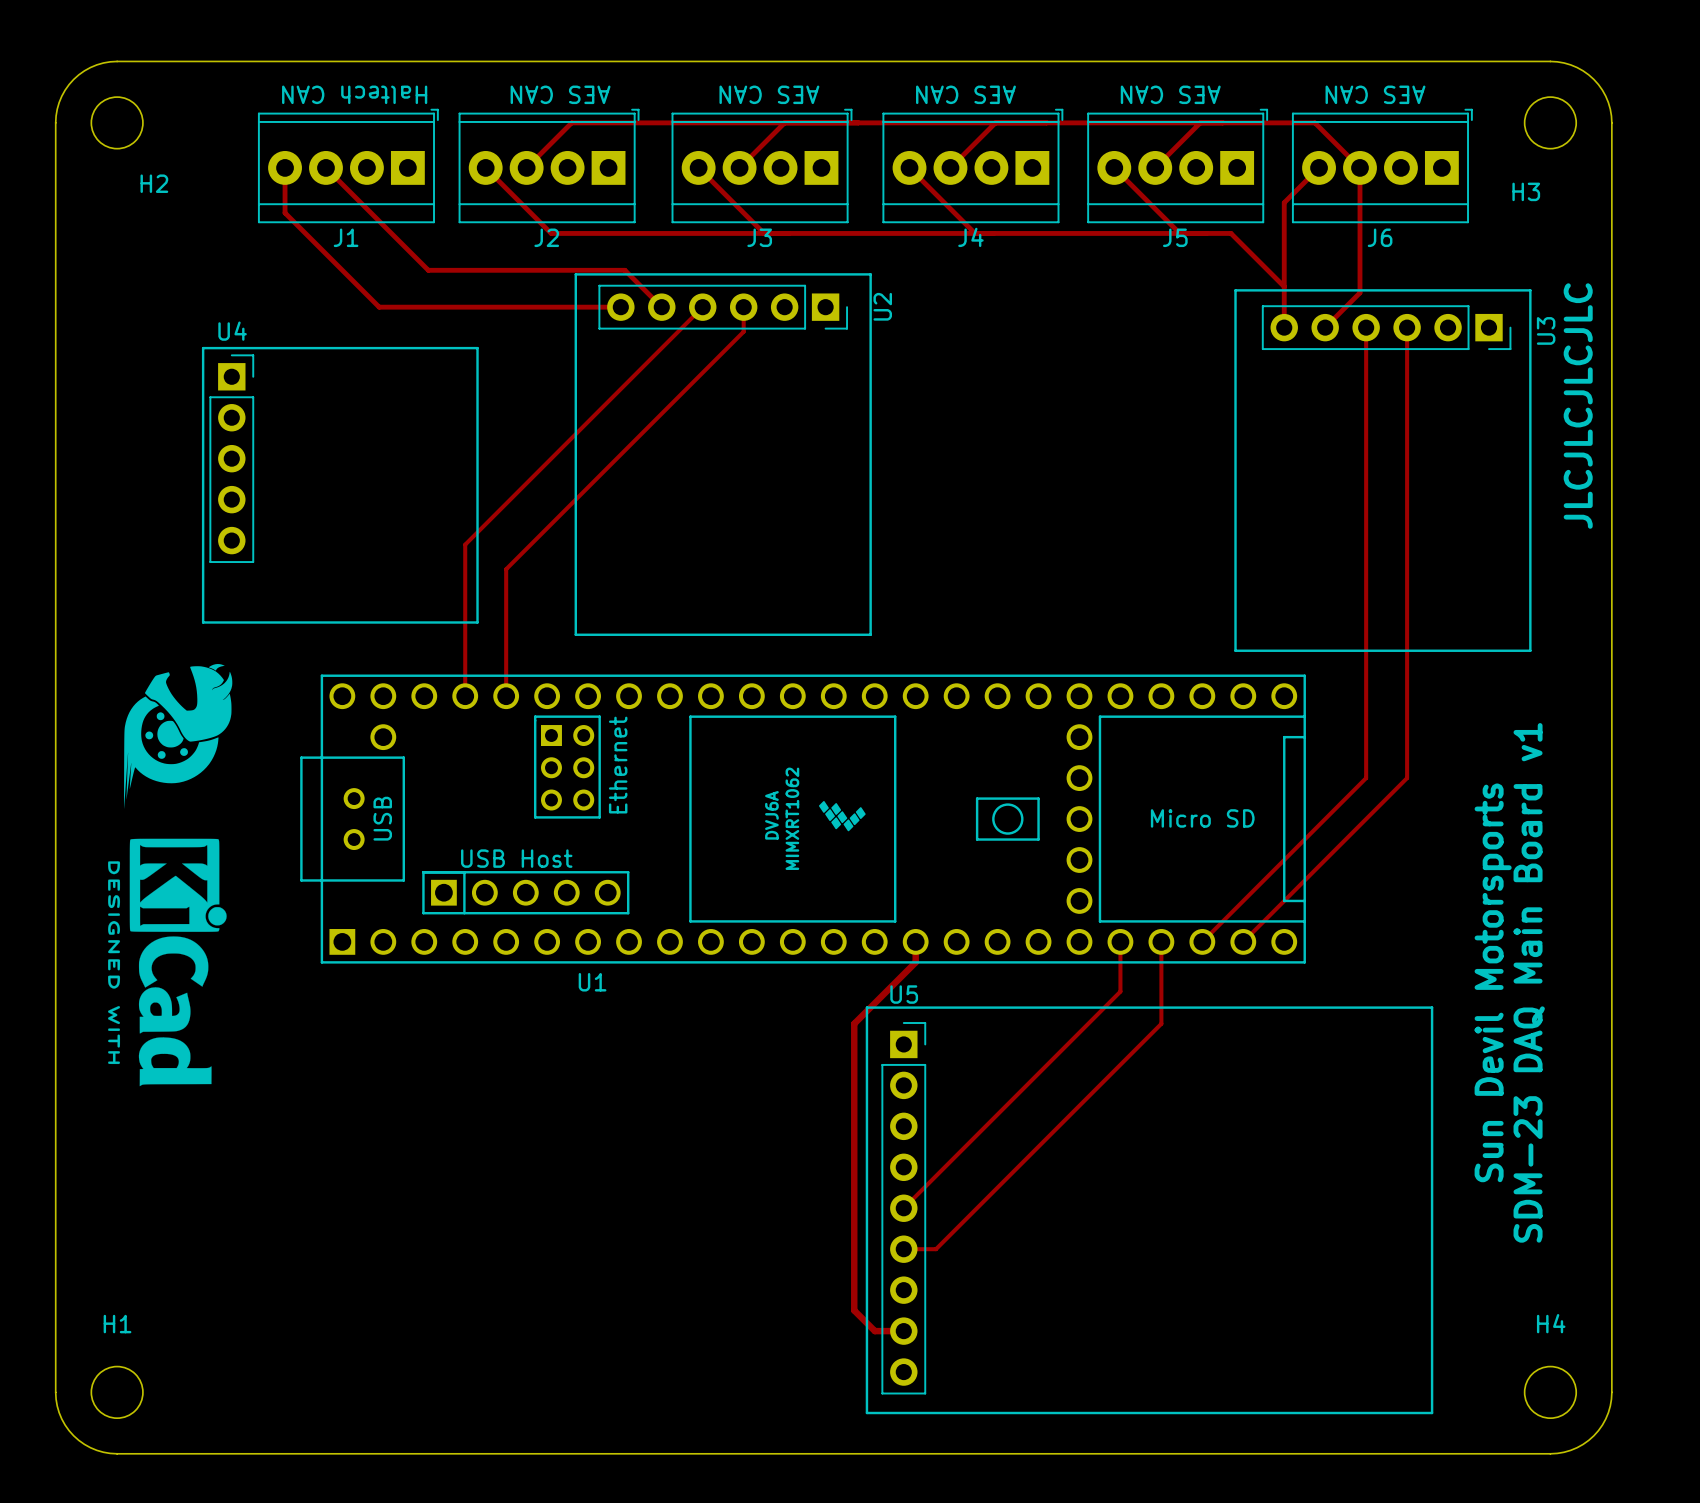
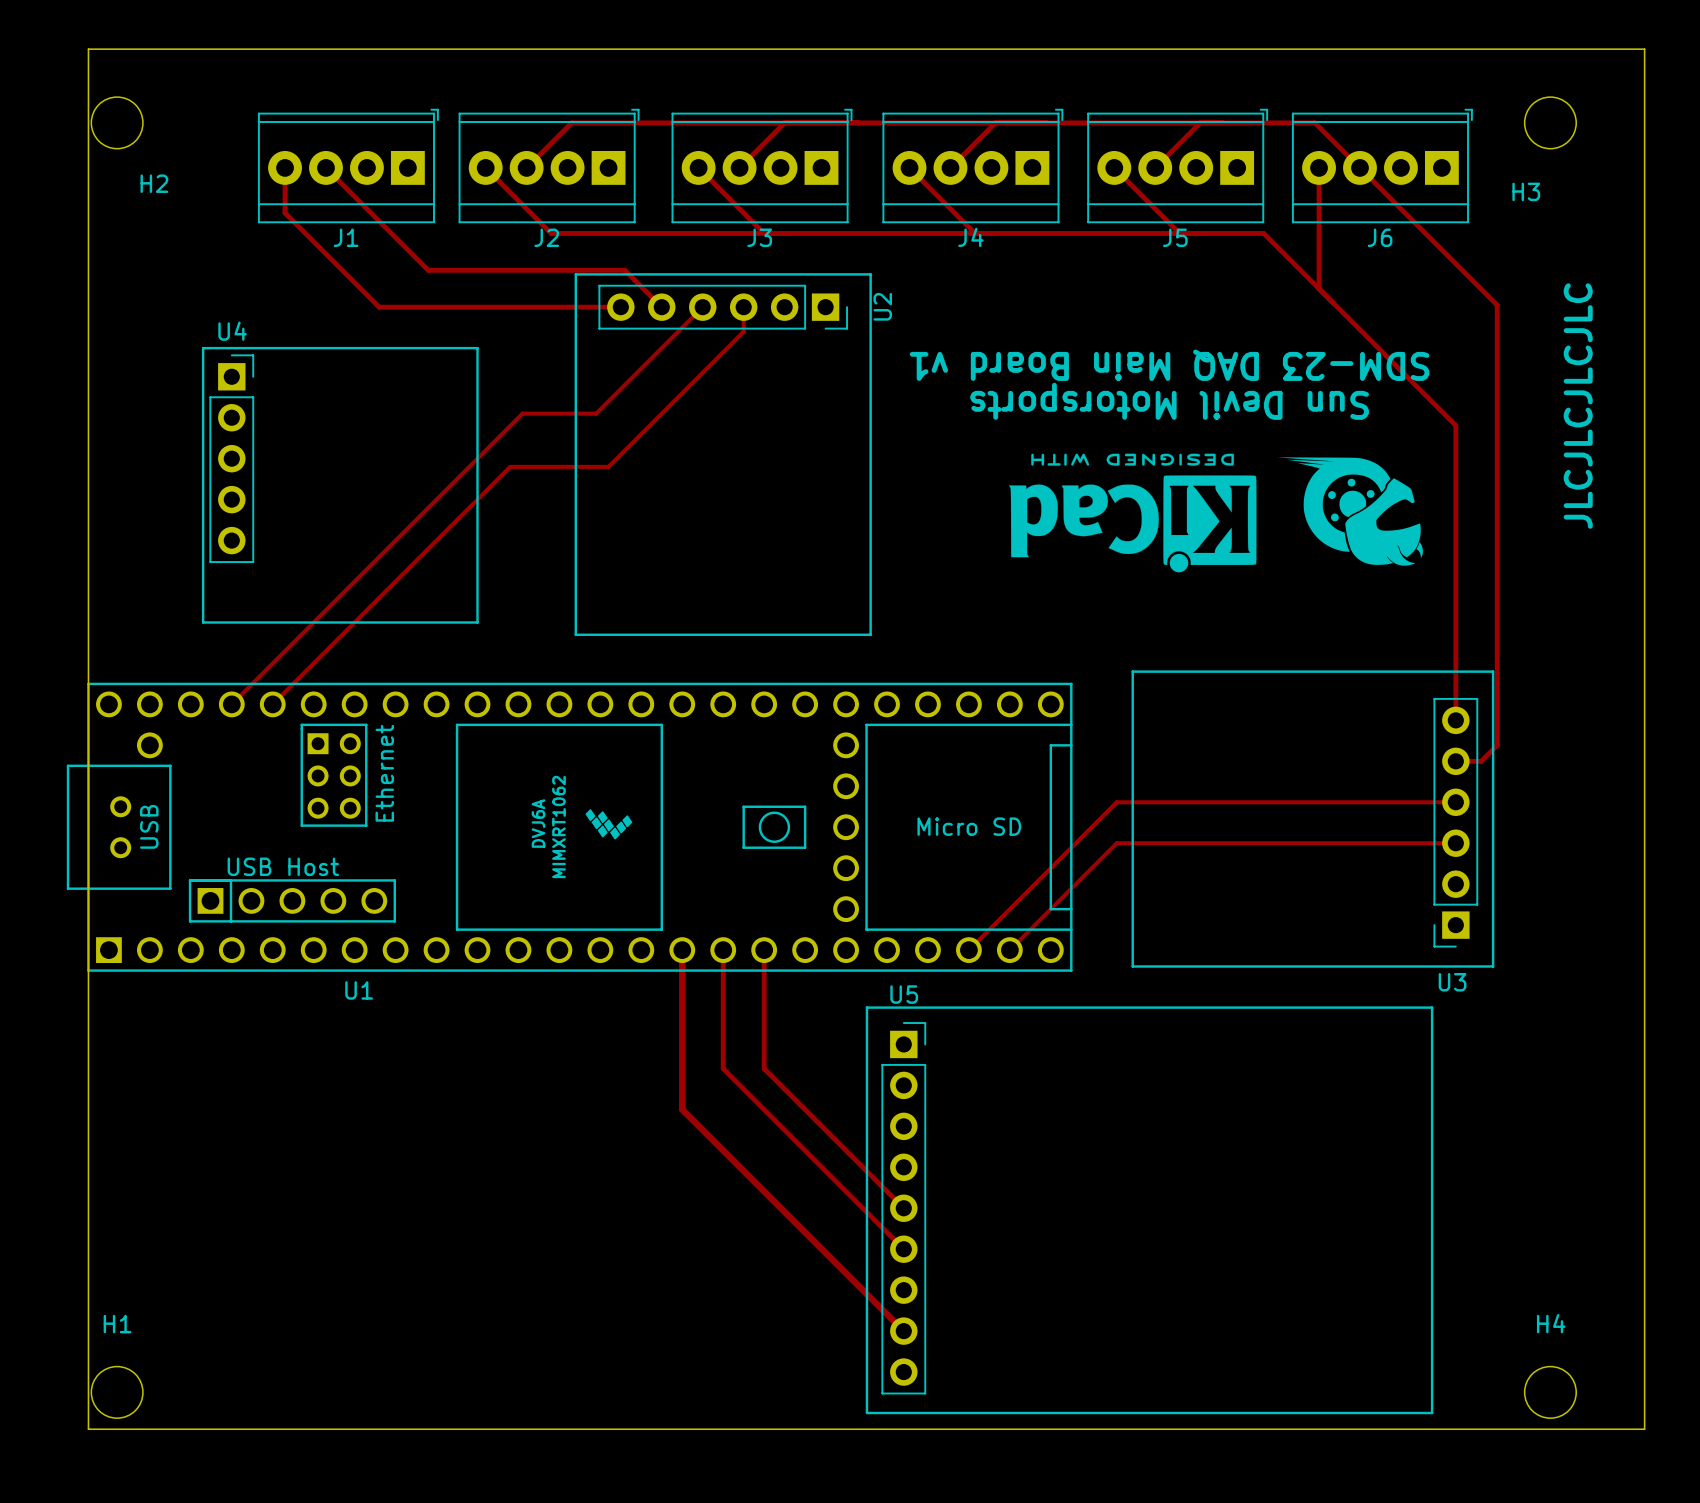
board edge: (117, 61) (1550, 61) (1570, 64) (1583, 70) (1593, 79) (1605, 96) (1610, 109) (1611, 122) (1611, 1392) (1608, 1412) (1602, 1425) (1593, 1435) (1583, 1444) (1570, 1450) (1550, 1453) (117, 1453) (96, 1450) (84, 1444) (73, 1435) (65, 1425) (59, 1412) (55, 1392) (55, 122) (59, 102) (65, 90) (73, 79) (90, 67) (103, 62) (117, 61) -> (88, 49) (88, 1429) (1644, 1429) (1644, 49) (88, 49)
text: Haltech CAN (354, 94) -> none
text: AES CAN (560, 94) -> none
text: AES CAN (769, 94) -> none
text: AES CAN (965, 94) -> none
text: AES CAN (1170, 94) -> none
text: AES CAN (1375, 94) -> none
track: (1319, 167) (1284, 202) (1284, 327) -> (1319, 167) (1319, 288)
track: (1359, 167) (1359, 292) (1325, 327) -> (1359, 167) (1497, 305) (1497, 745) (1481, 761) (1455, 761)
track: (1231, 233) (1284, 286) -> (1231, 233) (1263, 233) (1455, 425) (1455, 720)
line: (1235, 290) (1530, 290) (1530, 650) (1235, 650) (1235, 290) -> none
track: (1366, 327) (1366, 778) (1202, 941) -> none
U3 rotation: 0° (1386, 327) -> 90° clockwise (1455, 822)
U3 position: (1386, 327) -> (1455, 822)
track: (1407, 327) (1407, 778) (1243, 941) -> none
text: none -> SDM-23 DAQ Main Board v1 (1169, 365)
text: none -> Sun Devil Motorsports (1169, 401)
track: (596, 413) (465, 544) (465, 696) -> (596, 413) (522, 413) (231, 704)
drawing: none -> [1009, 453, 1257, 573]
drawing: none -> [1278, 457, 1423, 566]
track: (608, 466) (506, 569) (506, 696) -> (608, 466) (510, 466) (272, 704)
drawing: [124, 663, 233, 809] -> none
line: none -> (1132, 671) (1132, 966) (1493, 966) (1493, 671) (1132, 671)
track: none -> (1455, 802) (1116, 802) (968, 950)
U1 position: (803, 819) -> (569, 827)
drawing: [108, 838, 227, 1087] -> none
track: none -> (1455, 843) (1116, 843) (1009, 950)
track: (915, 941) (915, 962) (854, 1023) (854, 1310) (874, 1331) (903, 1331) -> (682, 950) (682, 1109) (903, 1331)
track: (1120, 941) (1120, 991) (903, 1208) -> (764, 950) (764, 1068) (903, 1208)
track: (1161, 941) (1161, 1023) (936, 1249) (903, 1249) -> (723, 950) (723, 1068) (903, 1249)
text: Sun Devil Motorsports (1493, 982) -> none
text: SDM-23 DAQ Main Board v1 (1529, 982) -> none

